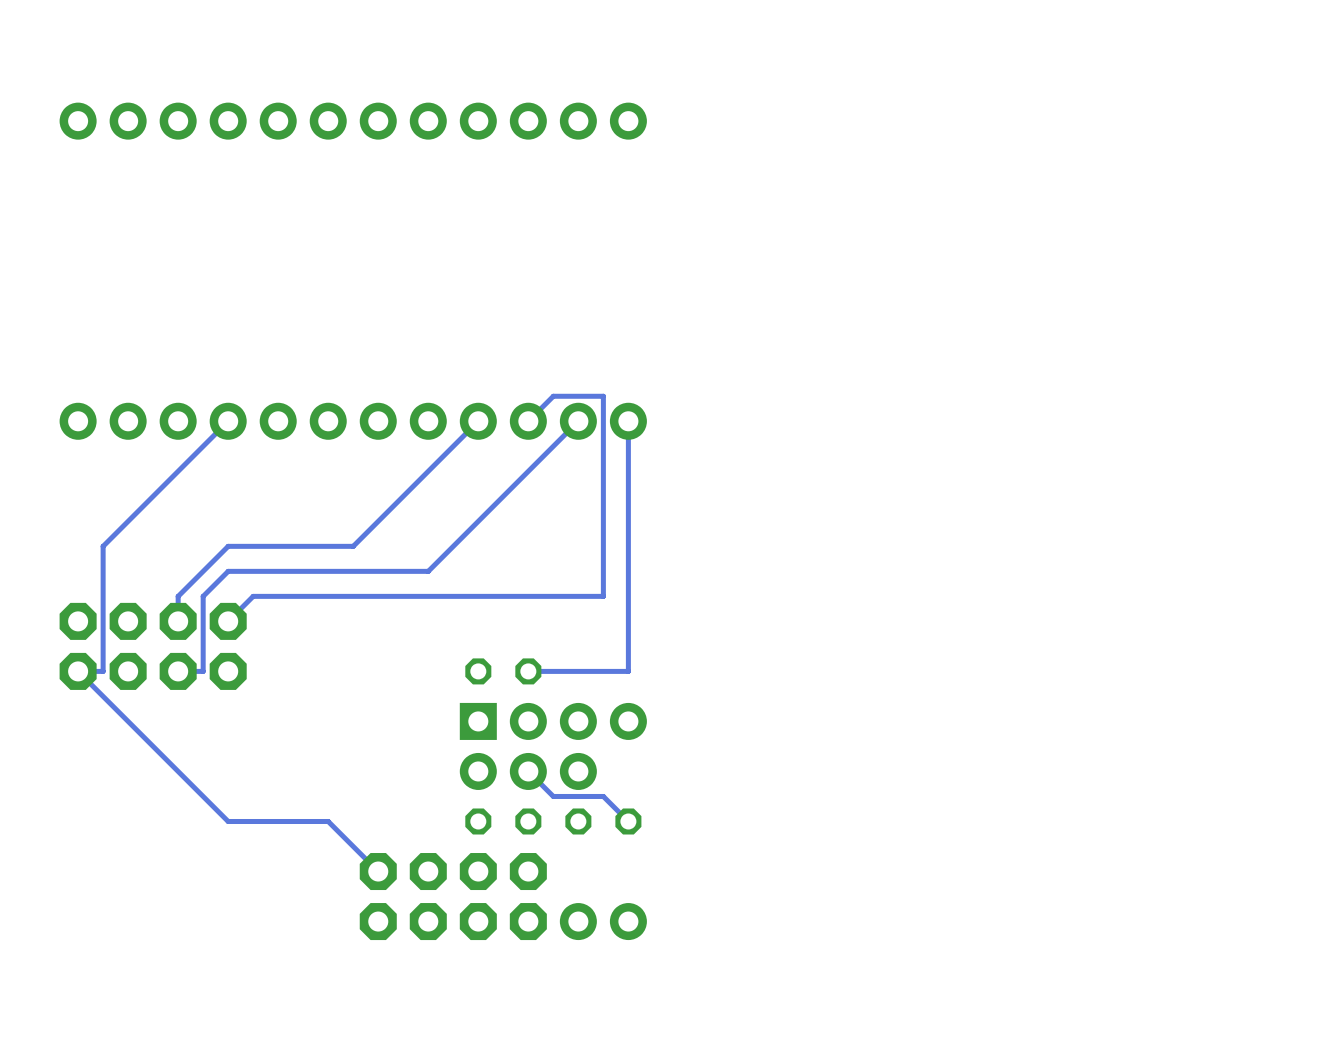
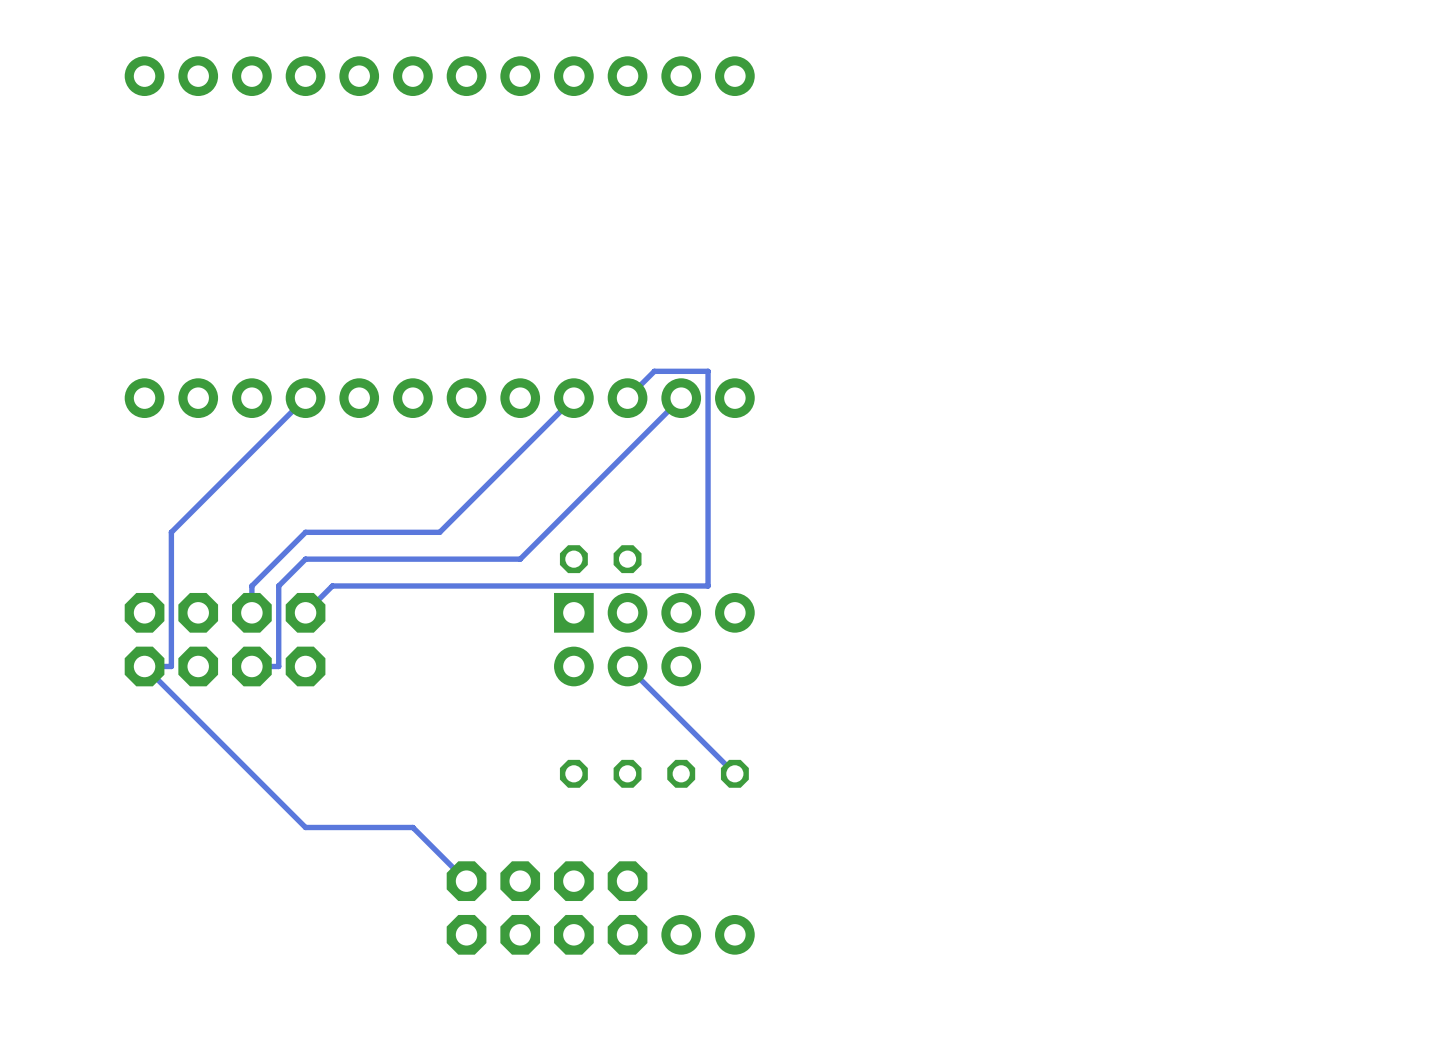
track: (628, 421) (628, 671) (528, 671) -> (734, 773) (627, 666)
part: none -> (600, 559)
part: (503, 671) -> none
part position: (553, 721) -> (654, 612)
part: none -> (600, 773)
track: (528, 771) (553, 796) (603, 796) (628, 821) -> none
part position: (528, 771) -> (627, 666)
part: (503, 821) -> none
part position: (603, 821) -> (708, 773)

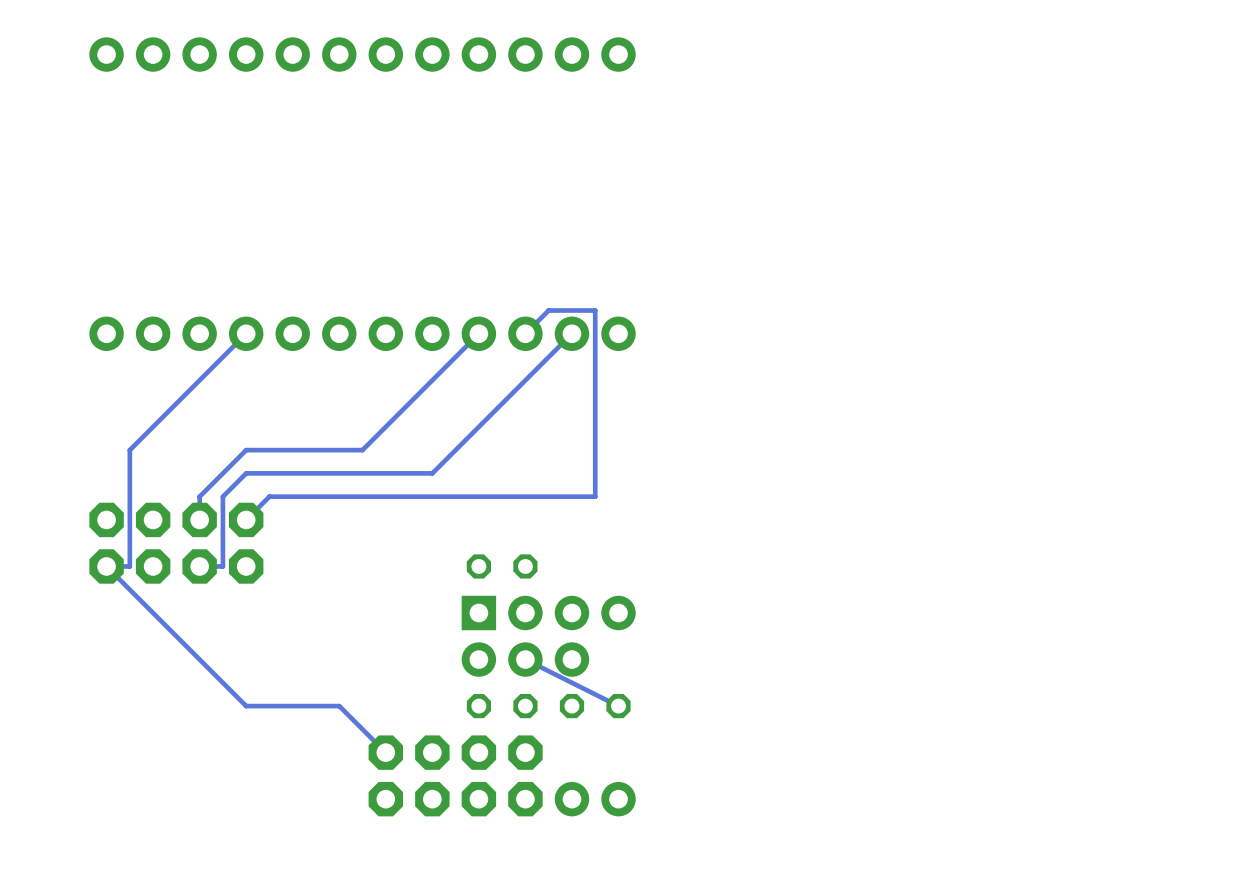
part: (600, 559) -> none
part position: (654, 612) -> (548, 613)
part: none -> (502, 566)
track: (627, 666) (734, 773) -> none
part position: (627, 666) -> (525, 659)
part: (600, 773) -> none
track: none -> (525, 659) (618, 706)
part position: (708, 773) -> (595, 706)
part: none -> (502, 706)

